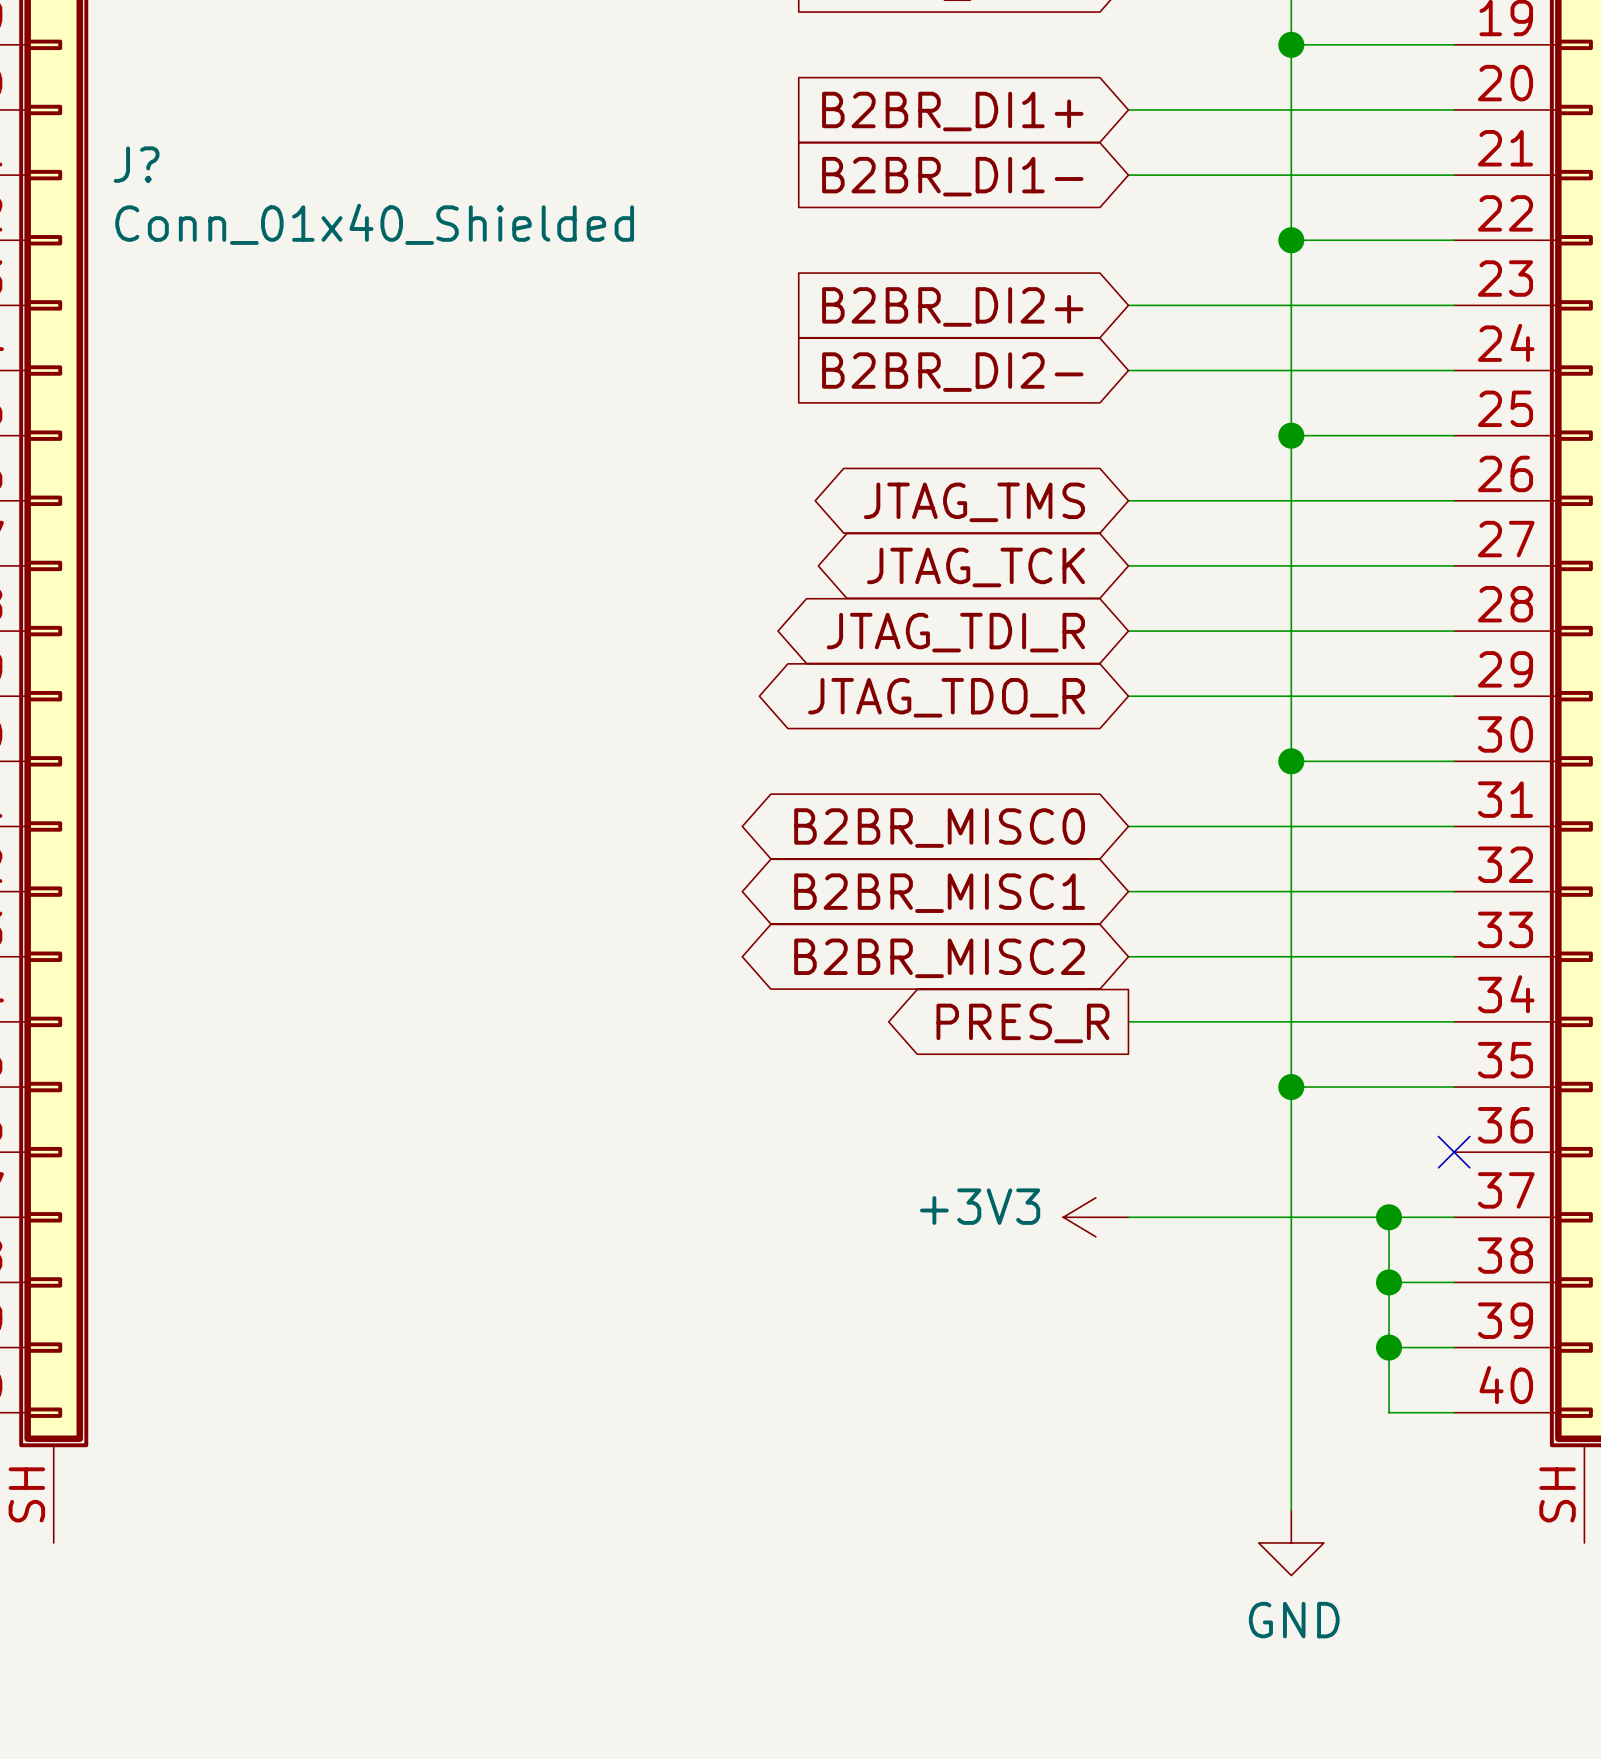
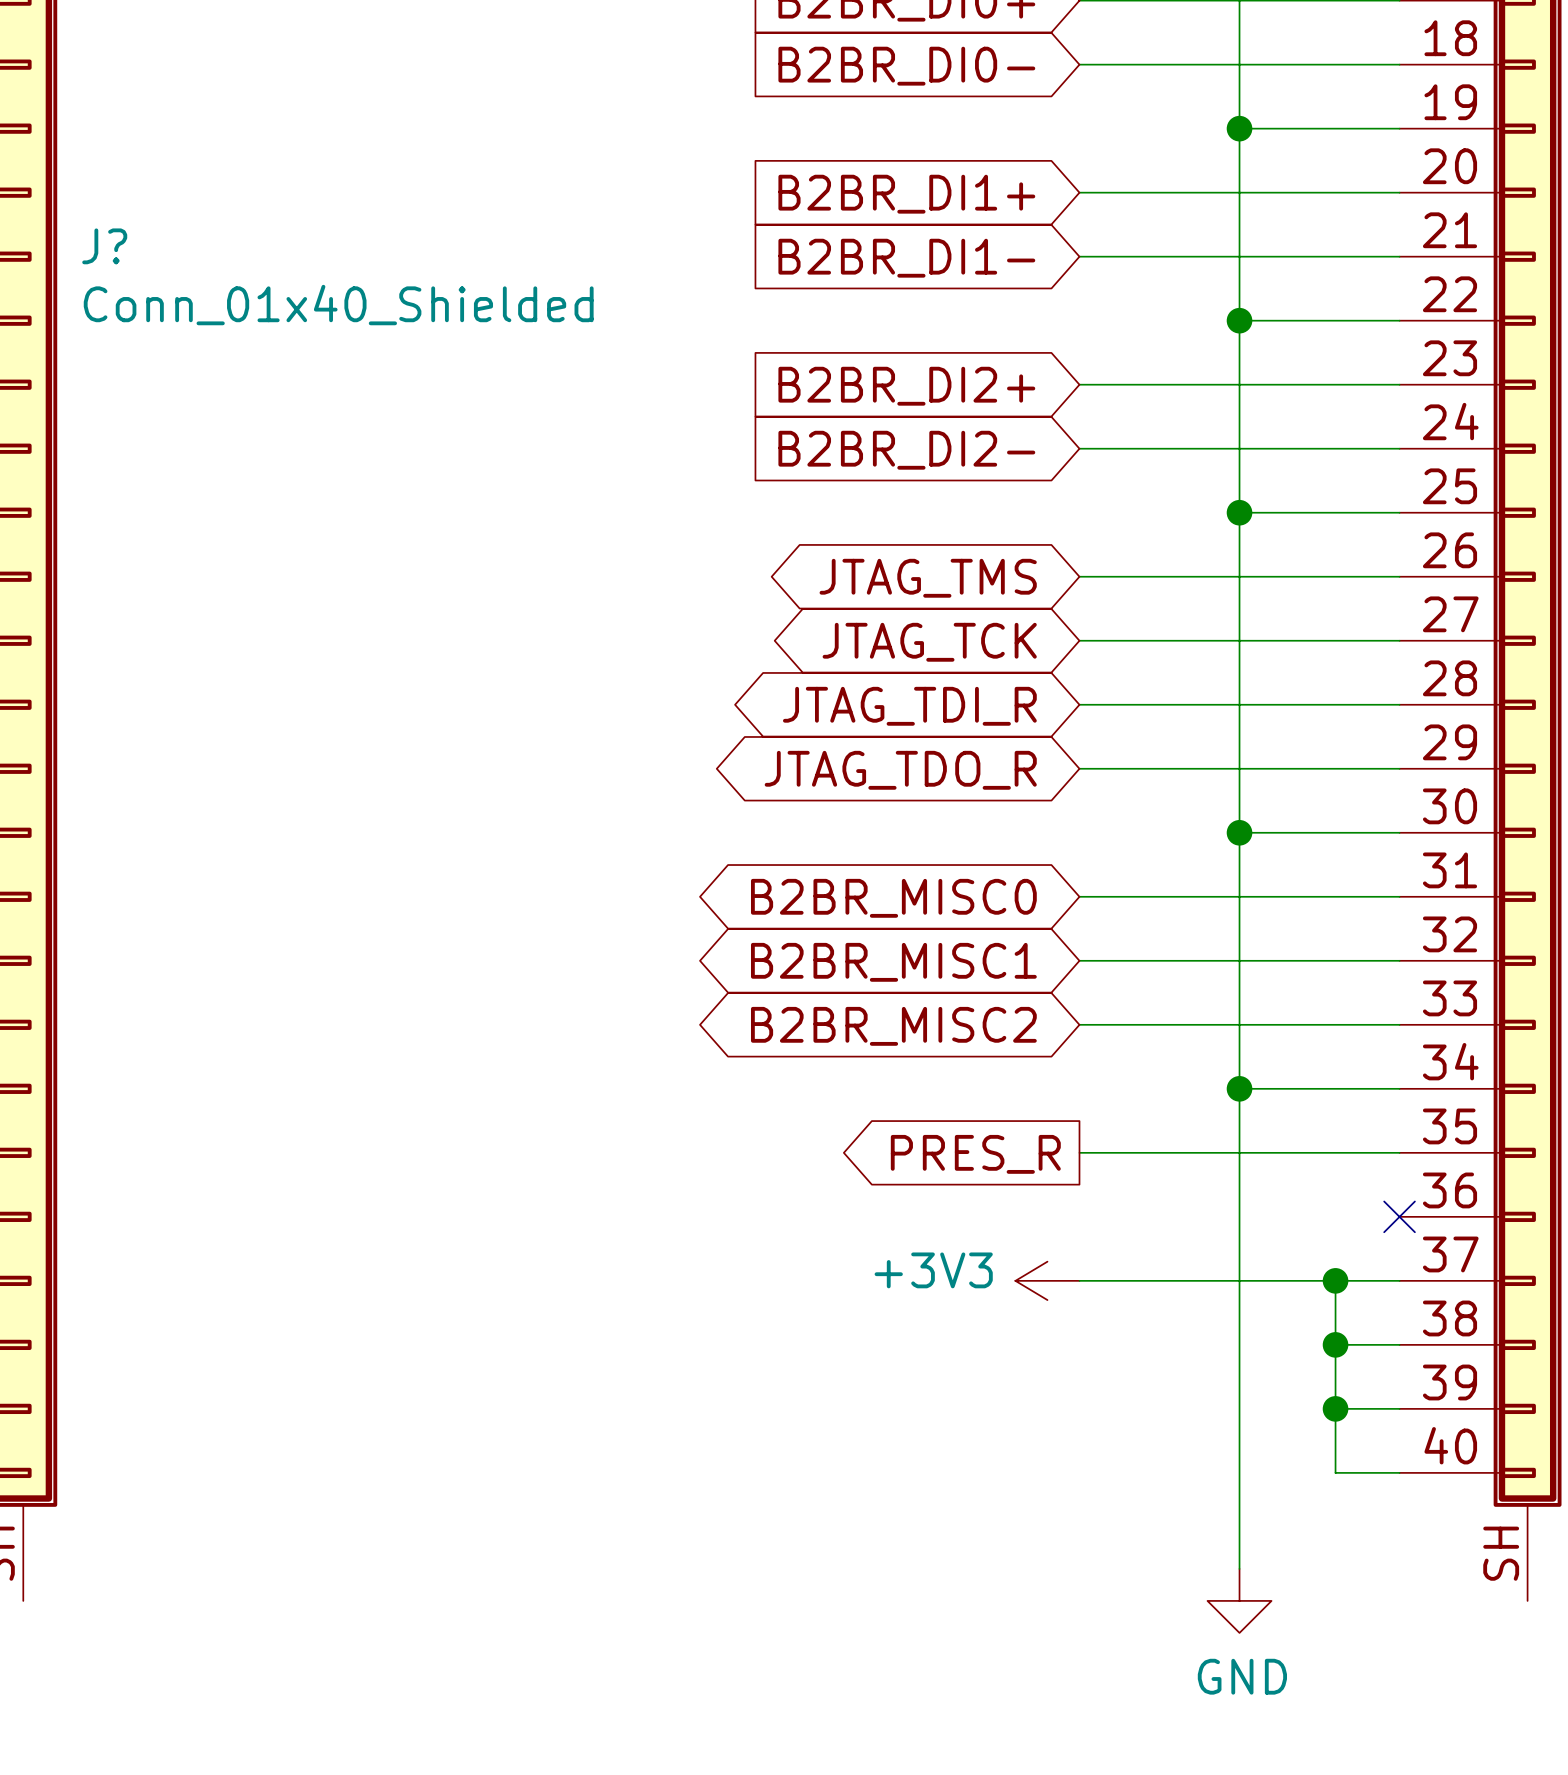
wire: (1128, 1021) (1291, 1021) -> (1079, 1152) (1239, 1152)
global label position: PRES_R (1022, 1023) -> PRES_R (975, 1154)
junction position: (1291, 1087) -> (1239, 1088)

